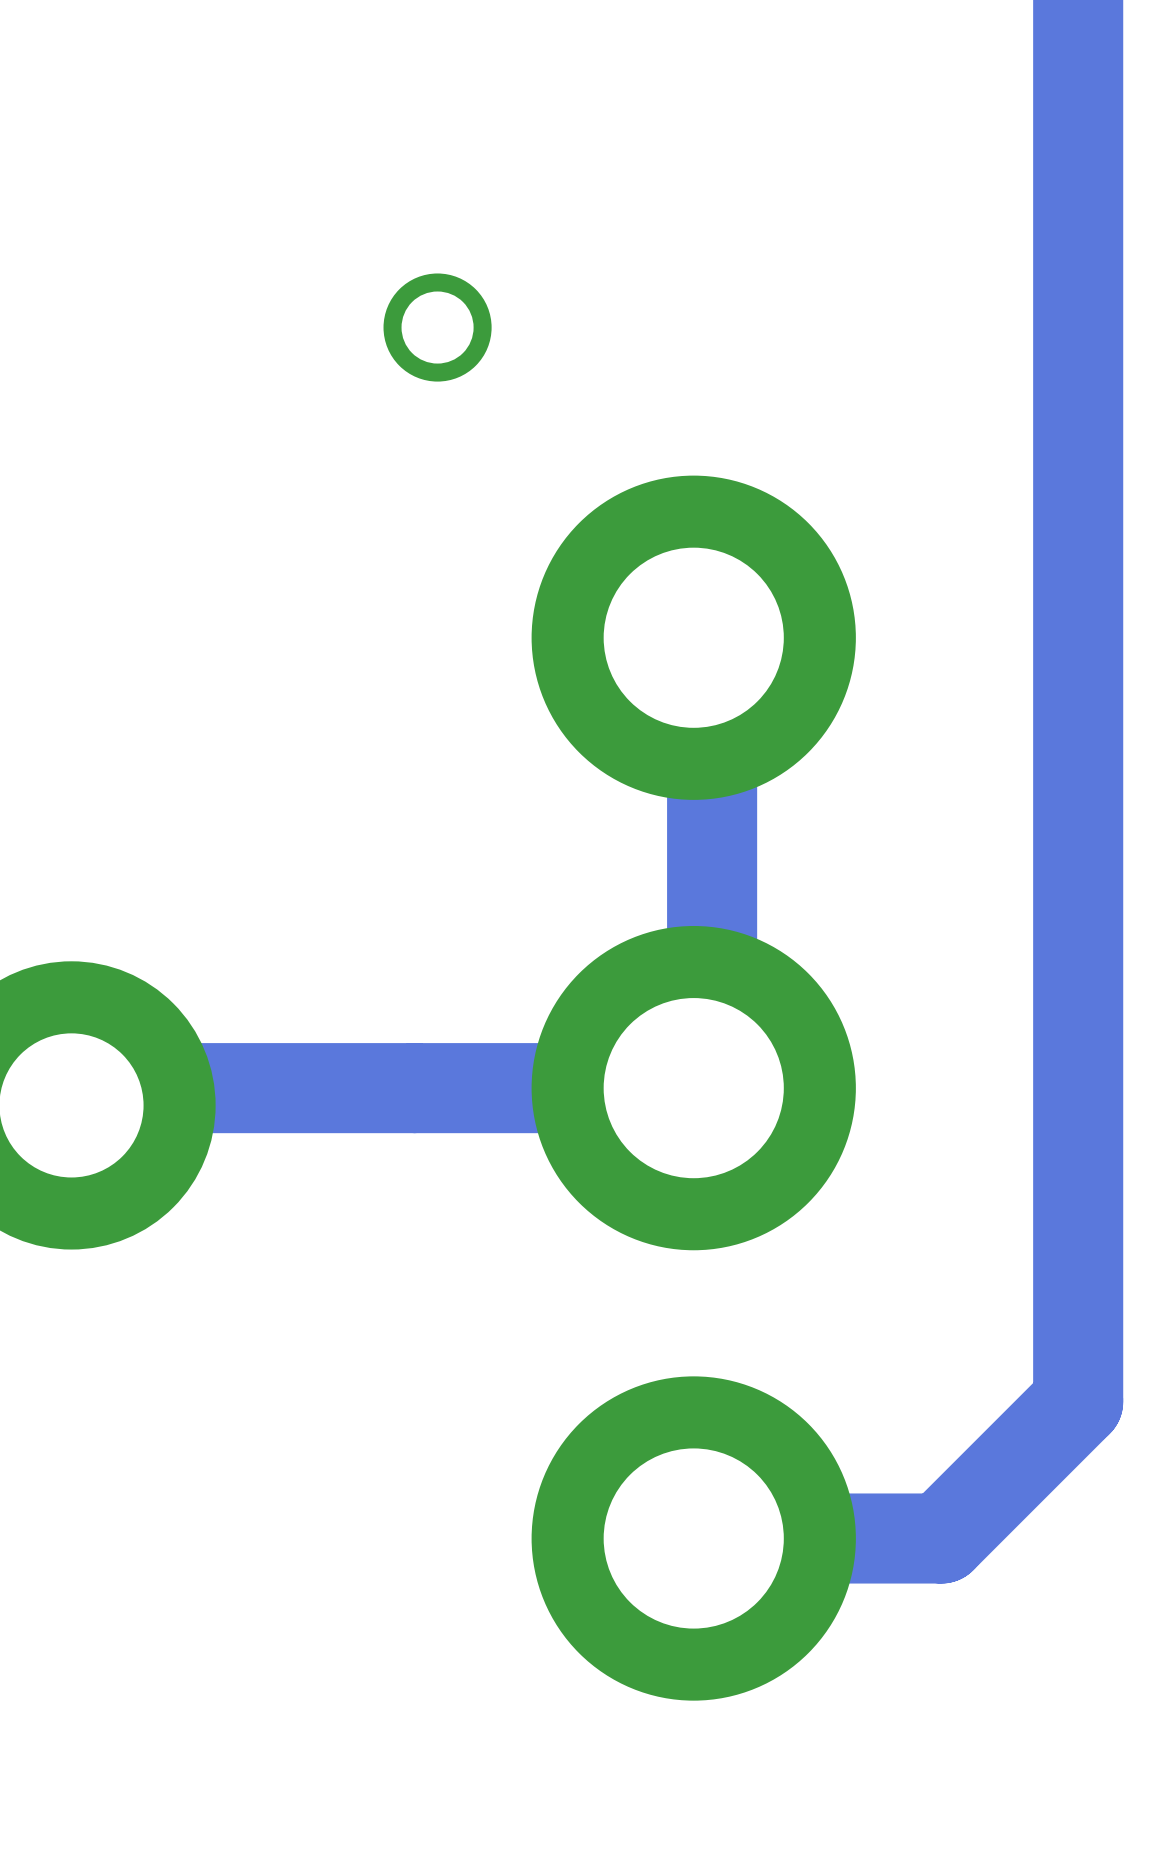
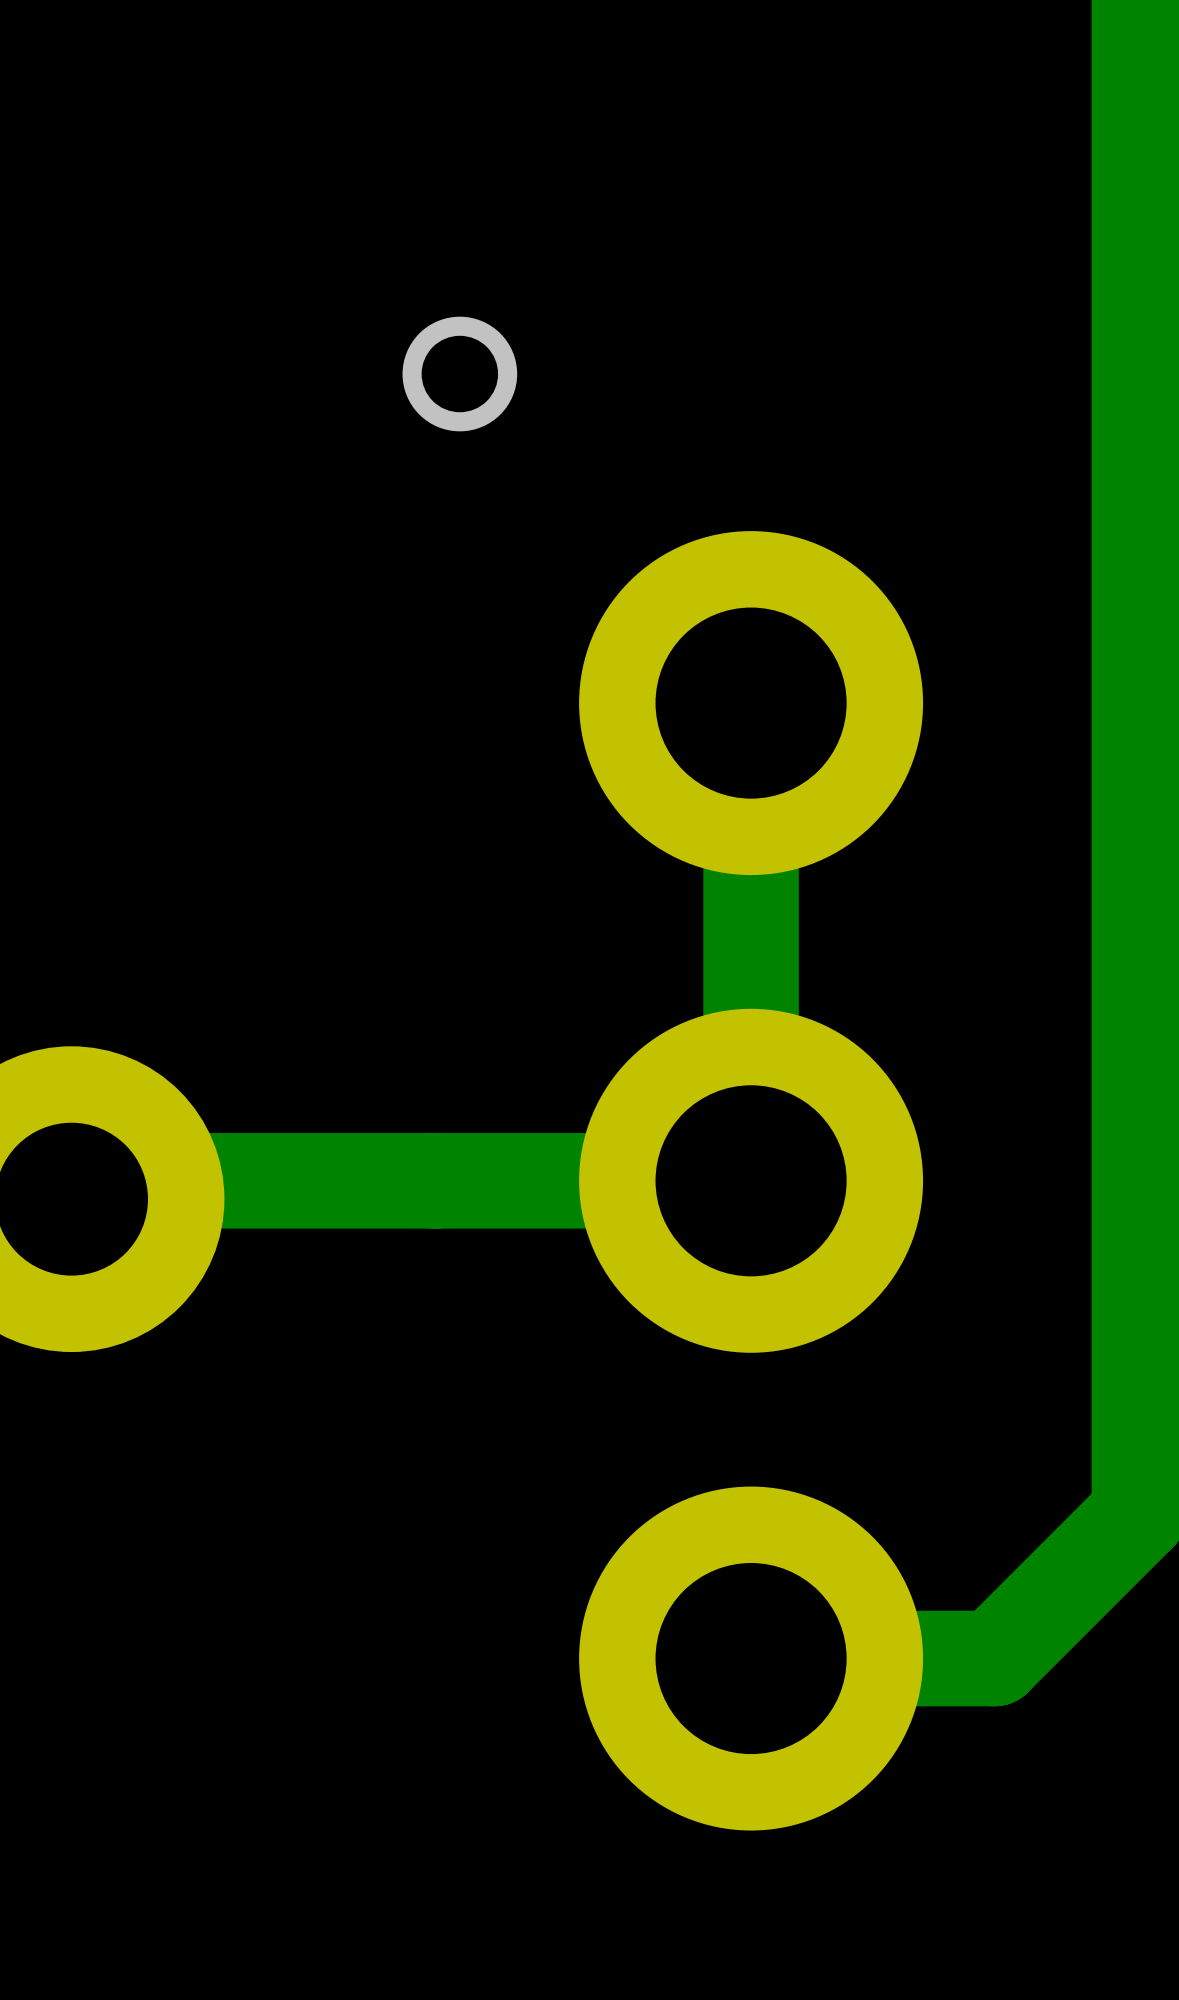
part position: (693, 1088) -> (751, 1180)

